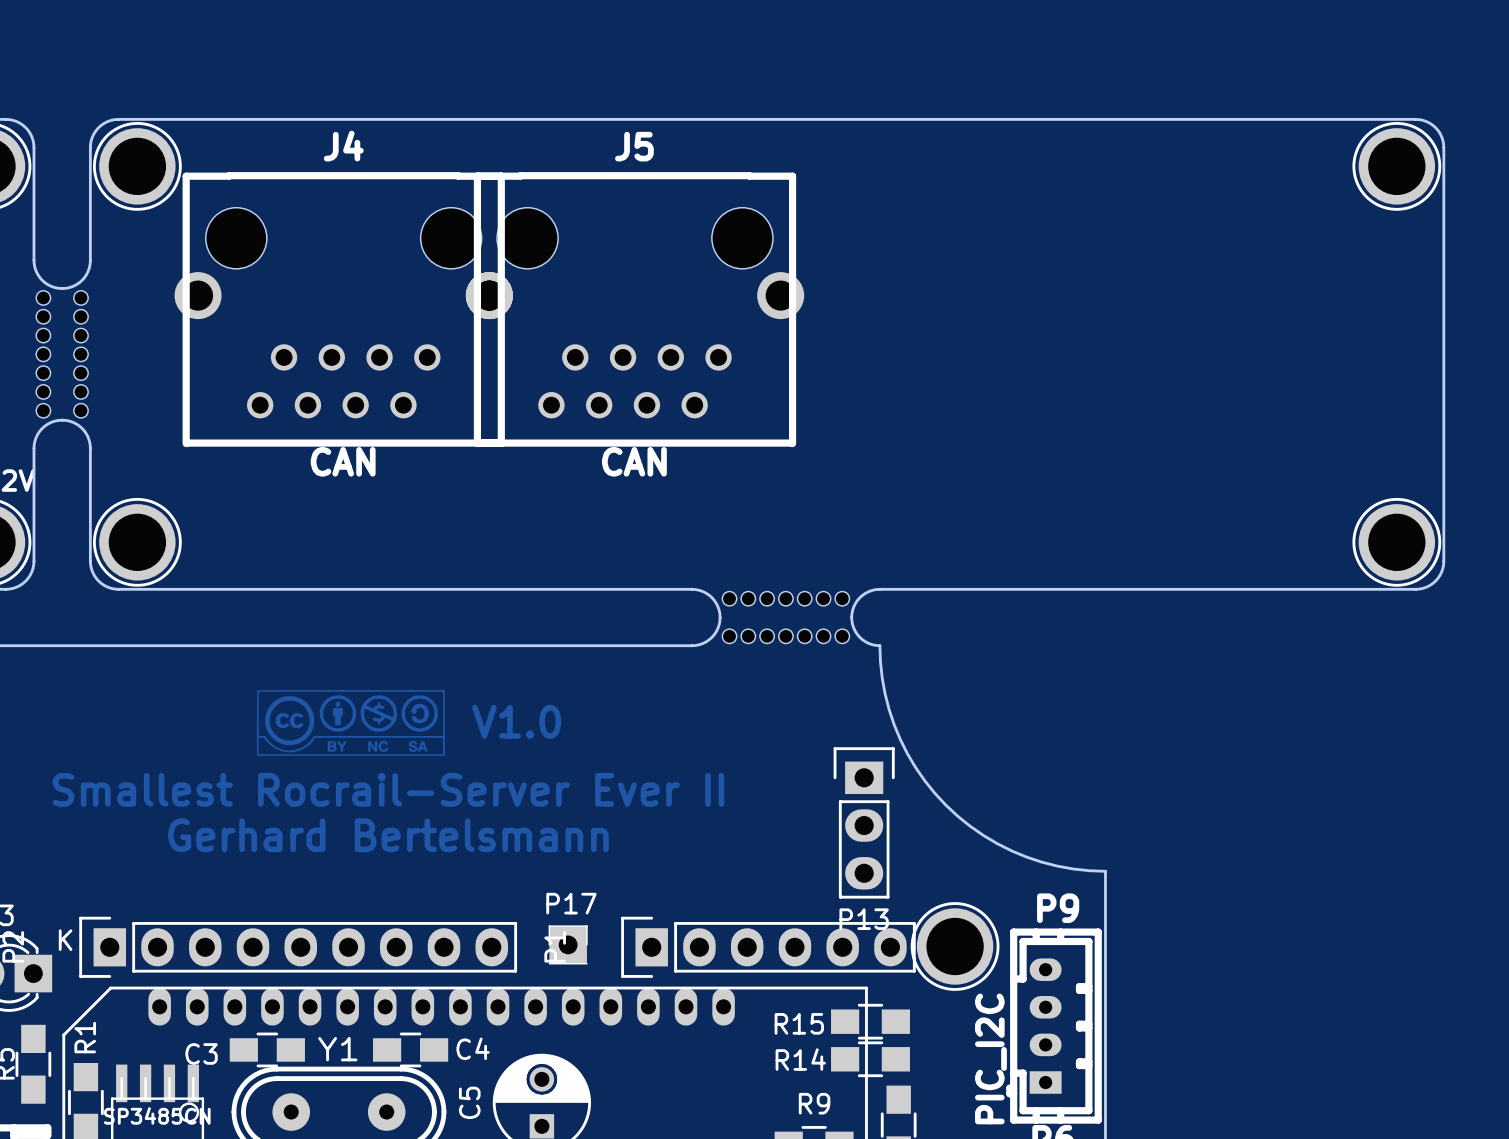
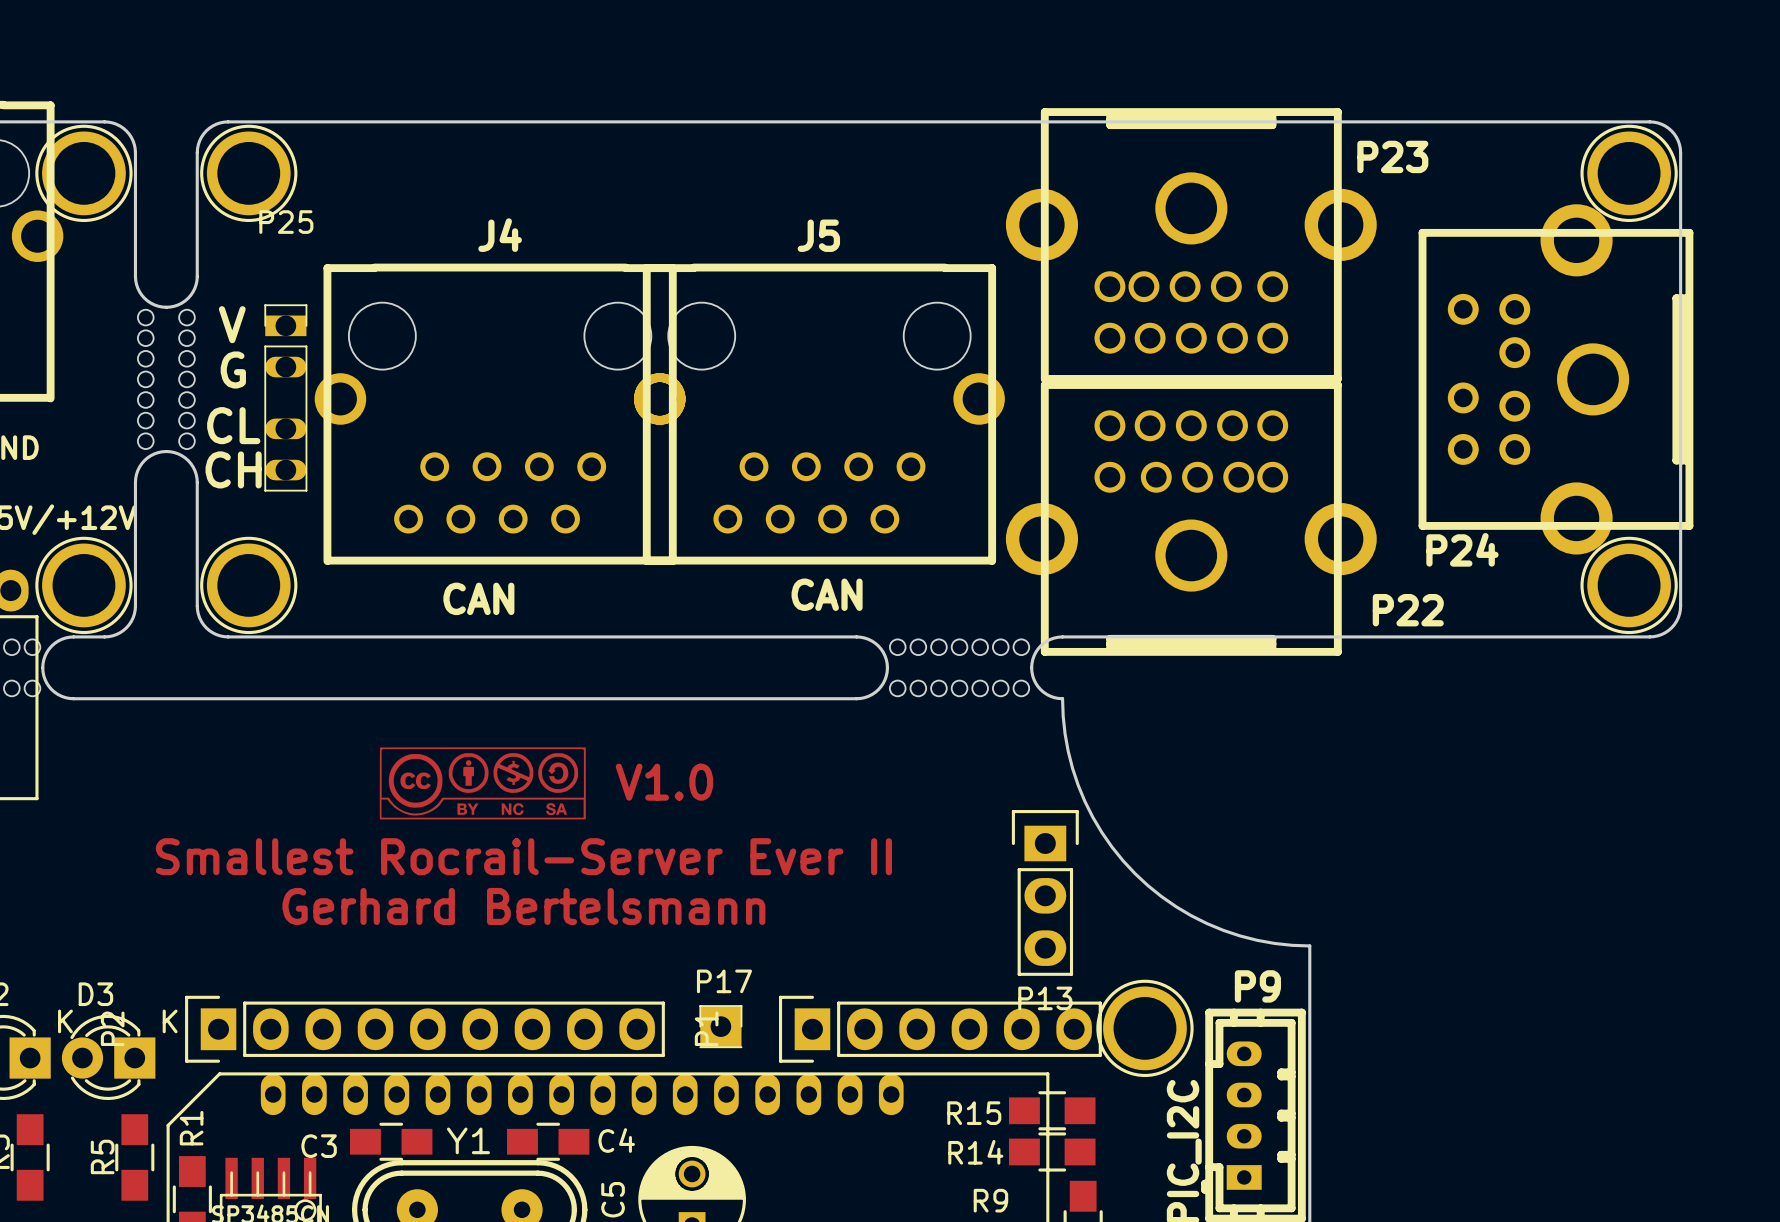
P23: none -> (1191, 245)
text: none -> V (232, 324)
J4 position: (343, 309) -> (500, 414)
J5 position: (635, 309) -> (819, 414)
text: none -> G (233, 370)
P24: none -> (1555, 379)
P25: none -> (285, 397)
text: none -> CL (233, 425)
text: none -> CH (233, 469)
J4 value position: CAN (343, 461) -> CAN (478, 598)
J5 value position: CAN (634, 461) -> CAN (827, 594)
P22: none -> (1191, 518)

